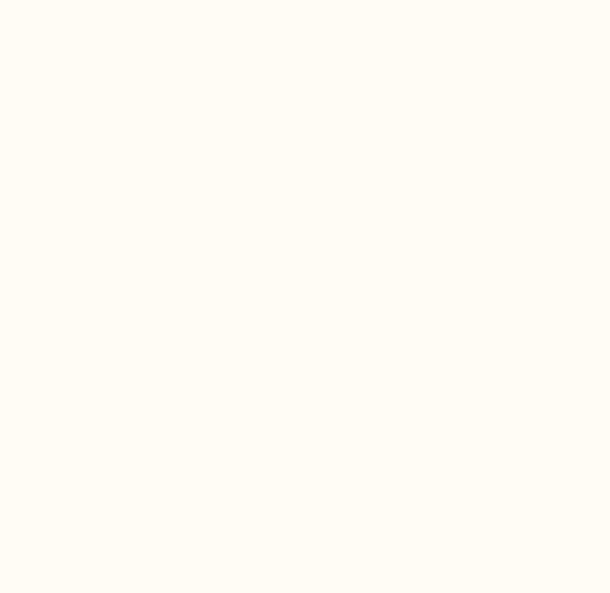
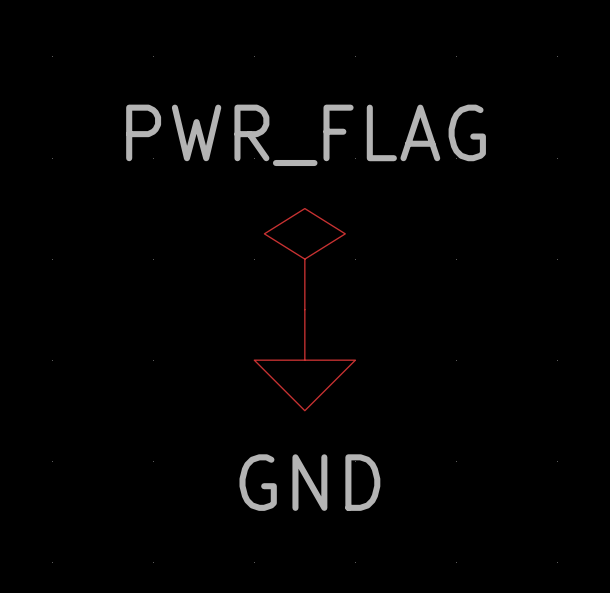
power symbol: none -> PWR_FLAG (304, 259)
power symbol: none -> GND (304, 360)

